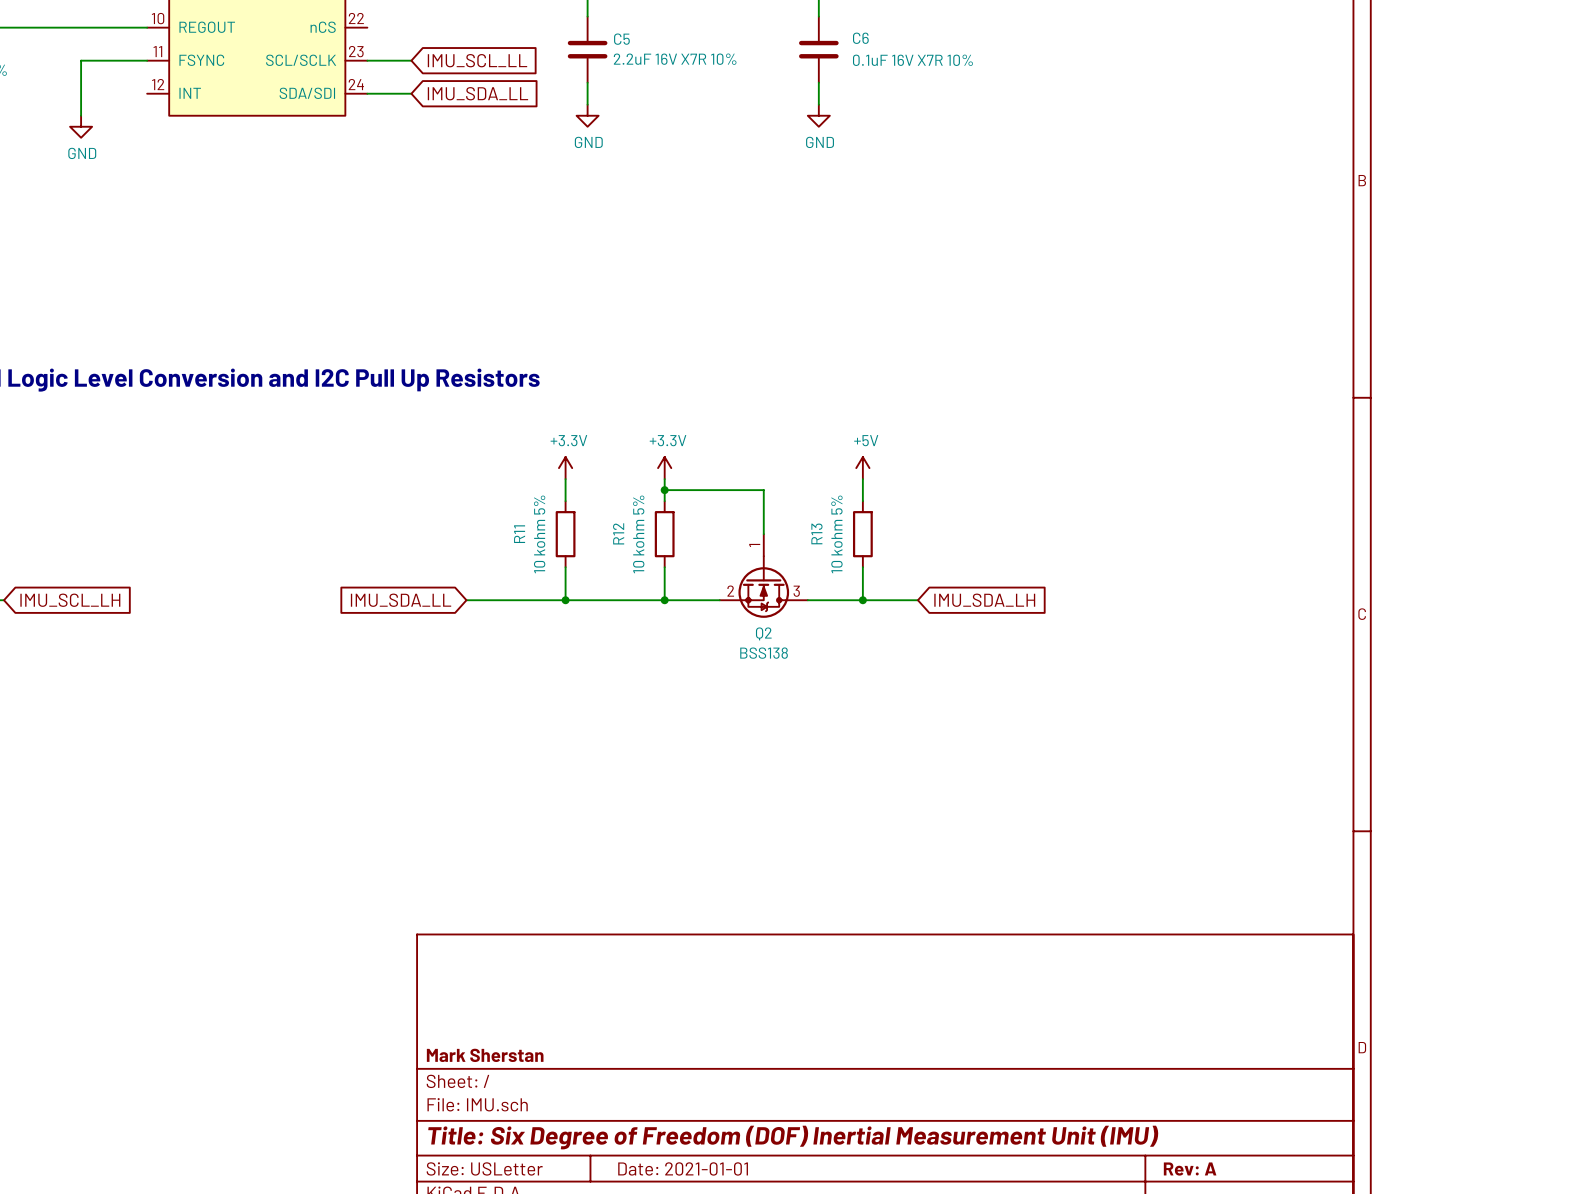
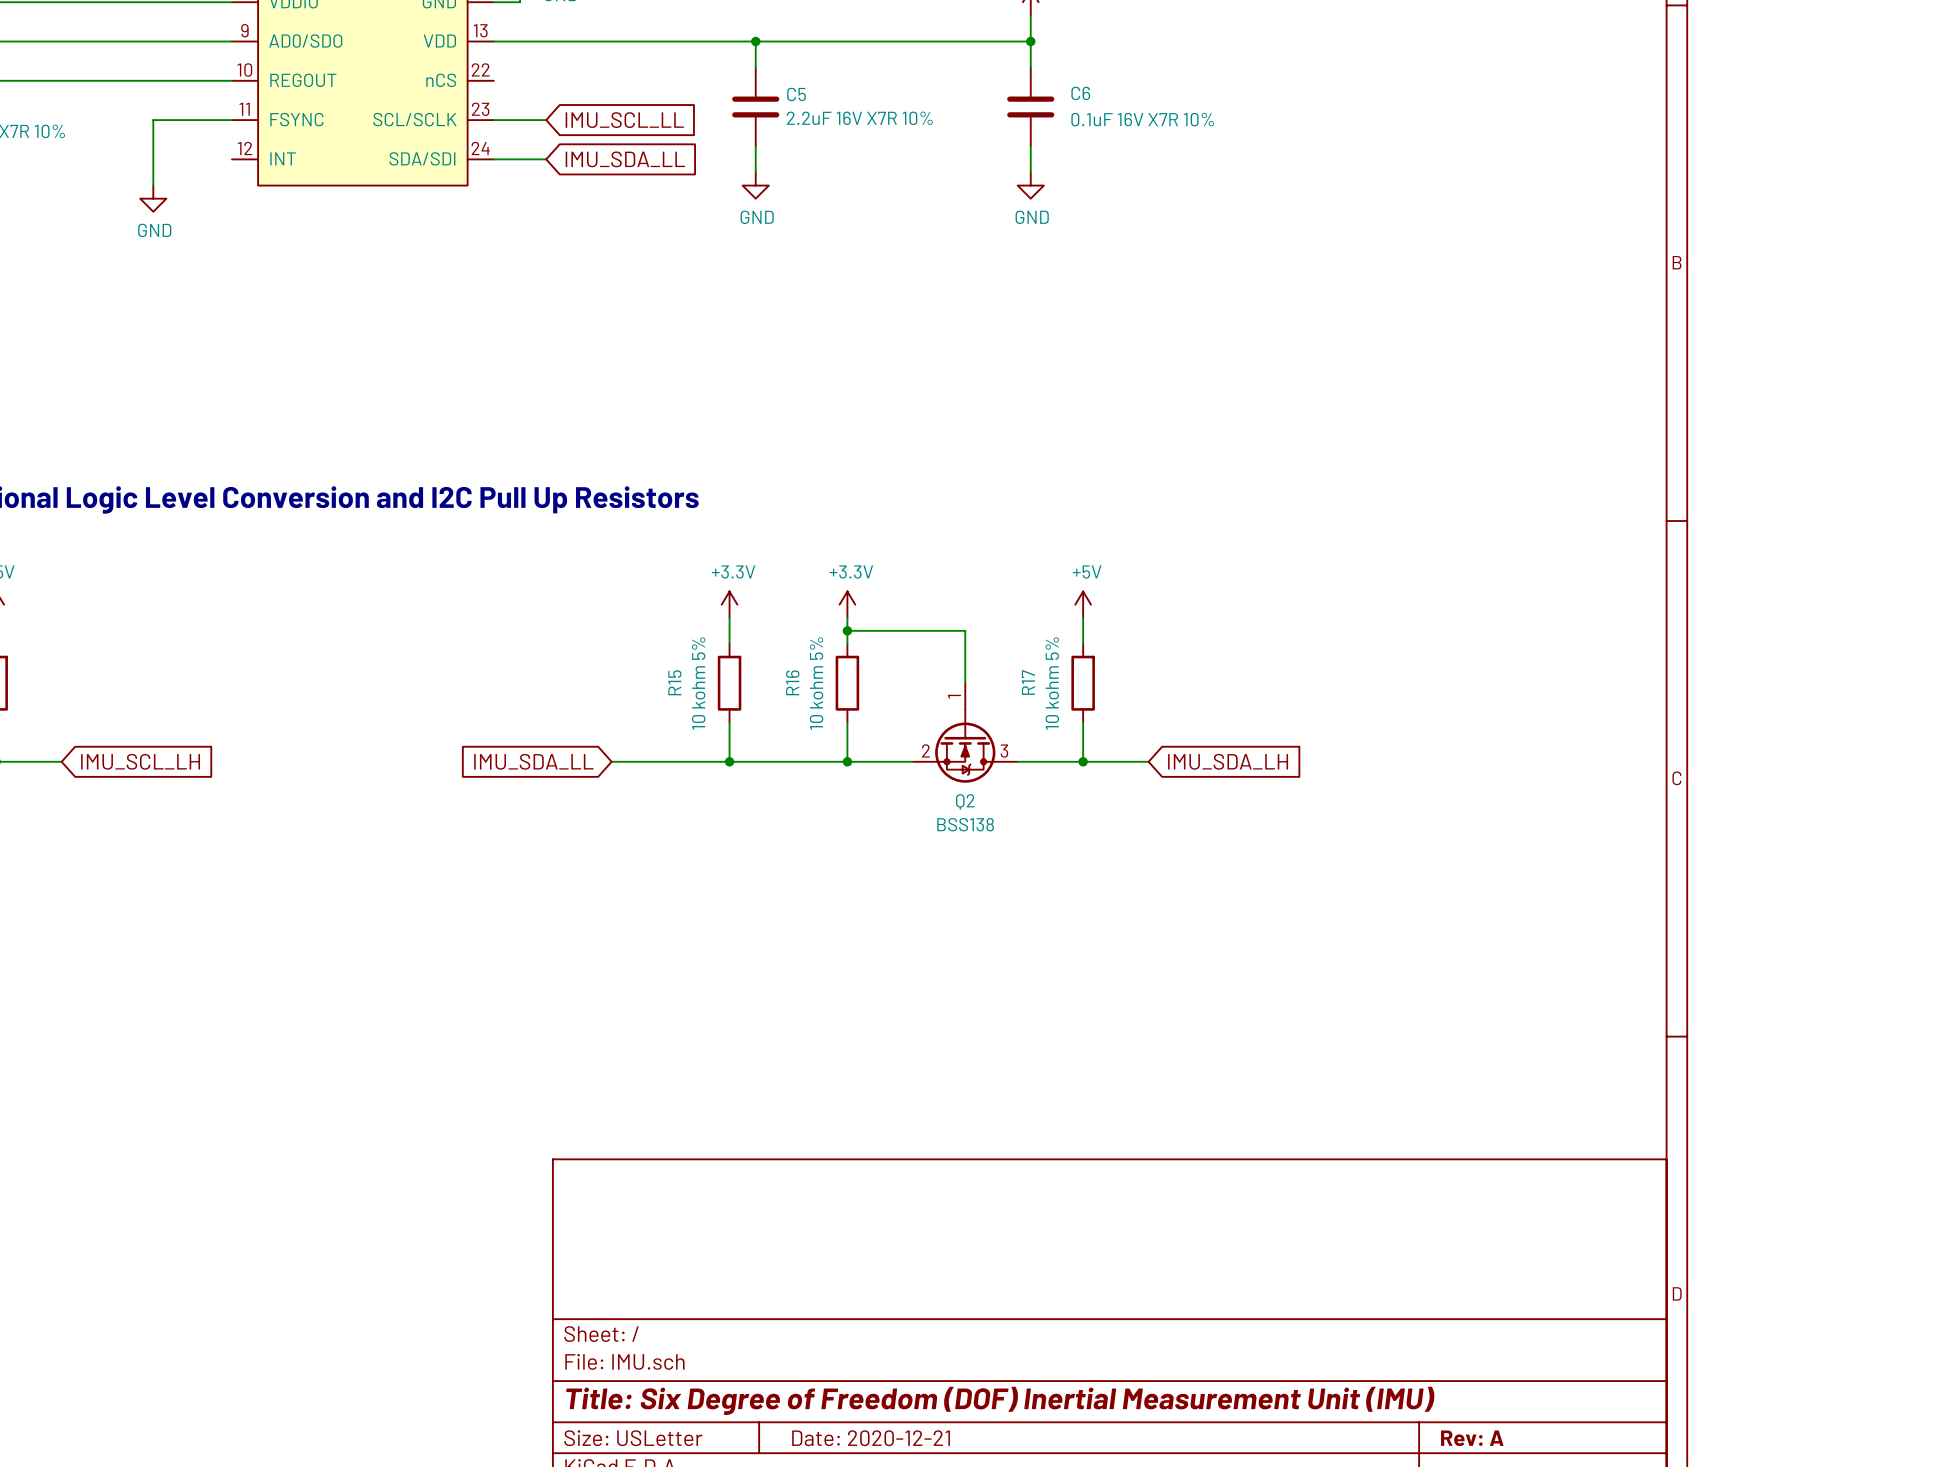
R12 name: R12 (618, 533) -> R16 (792, 682)
R13 name: R13 (816, 533) -> R17 (1028, 682)
R11 name: R11 (519, 534) -> R15 (674, 682)
title block: Mark Sherstan (485, 1055) -> none
title block: Date: 2021-01-01 (683, 1168) -> Date: 2020-12-21 (871, 1438)

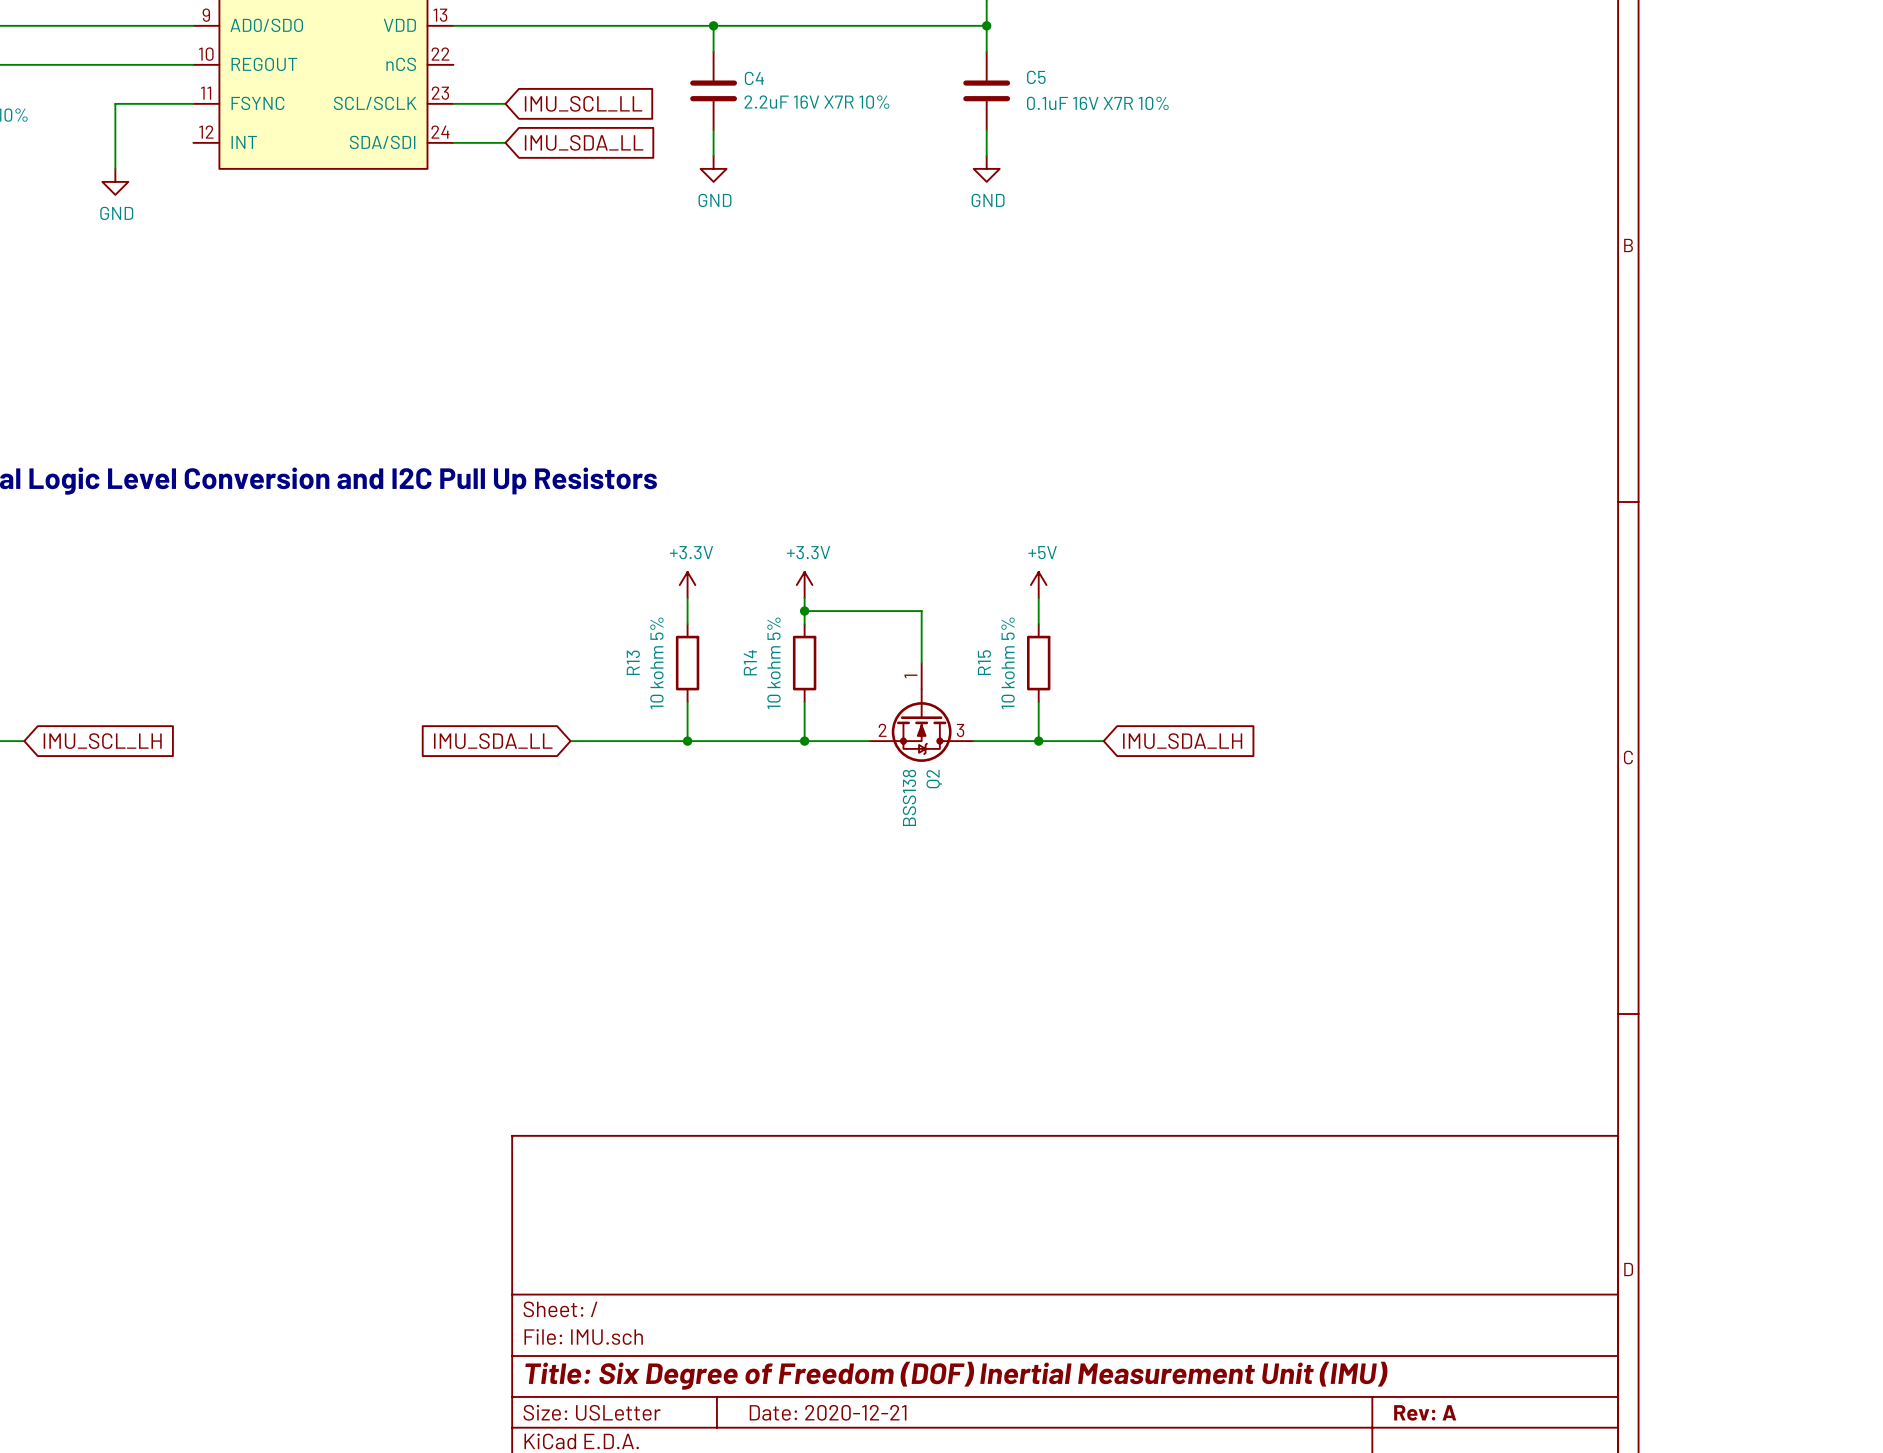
C6 name: C6 (1080, 93) -> C5 (1036, 77)
C5 name: C5 (796, 94) -> C4 (754, 78)
R15 name: R15 (674, 682) -> R13 (633, 662)
R16 name: R16 (792, 682) -> R14 (750, 662)
R17 name: R17 (1028, 682) -> R15 (984, 662)
Q2 name rotation: 0° (965, 801) -> 90° counterclockwise (934, 779)
Q2 value rotation: 0° (965, 824) -> 90° counterclockwise (909, 797)

